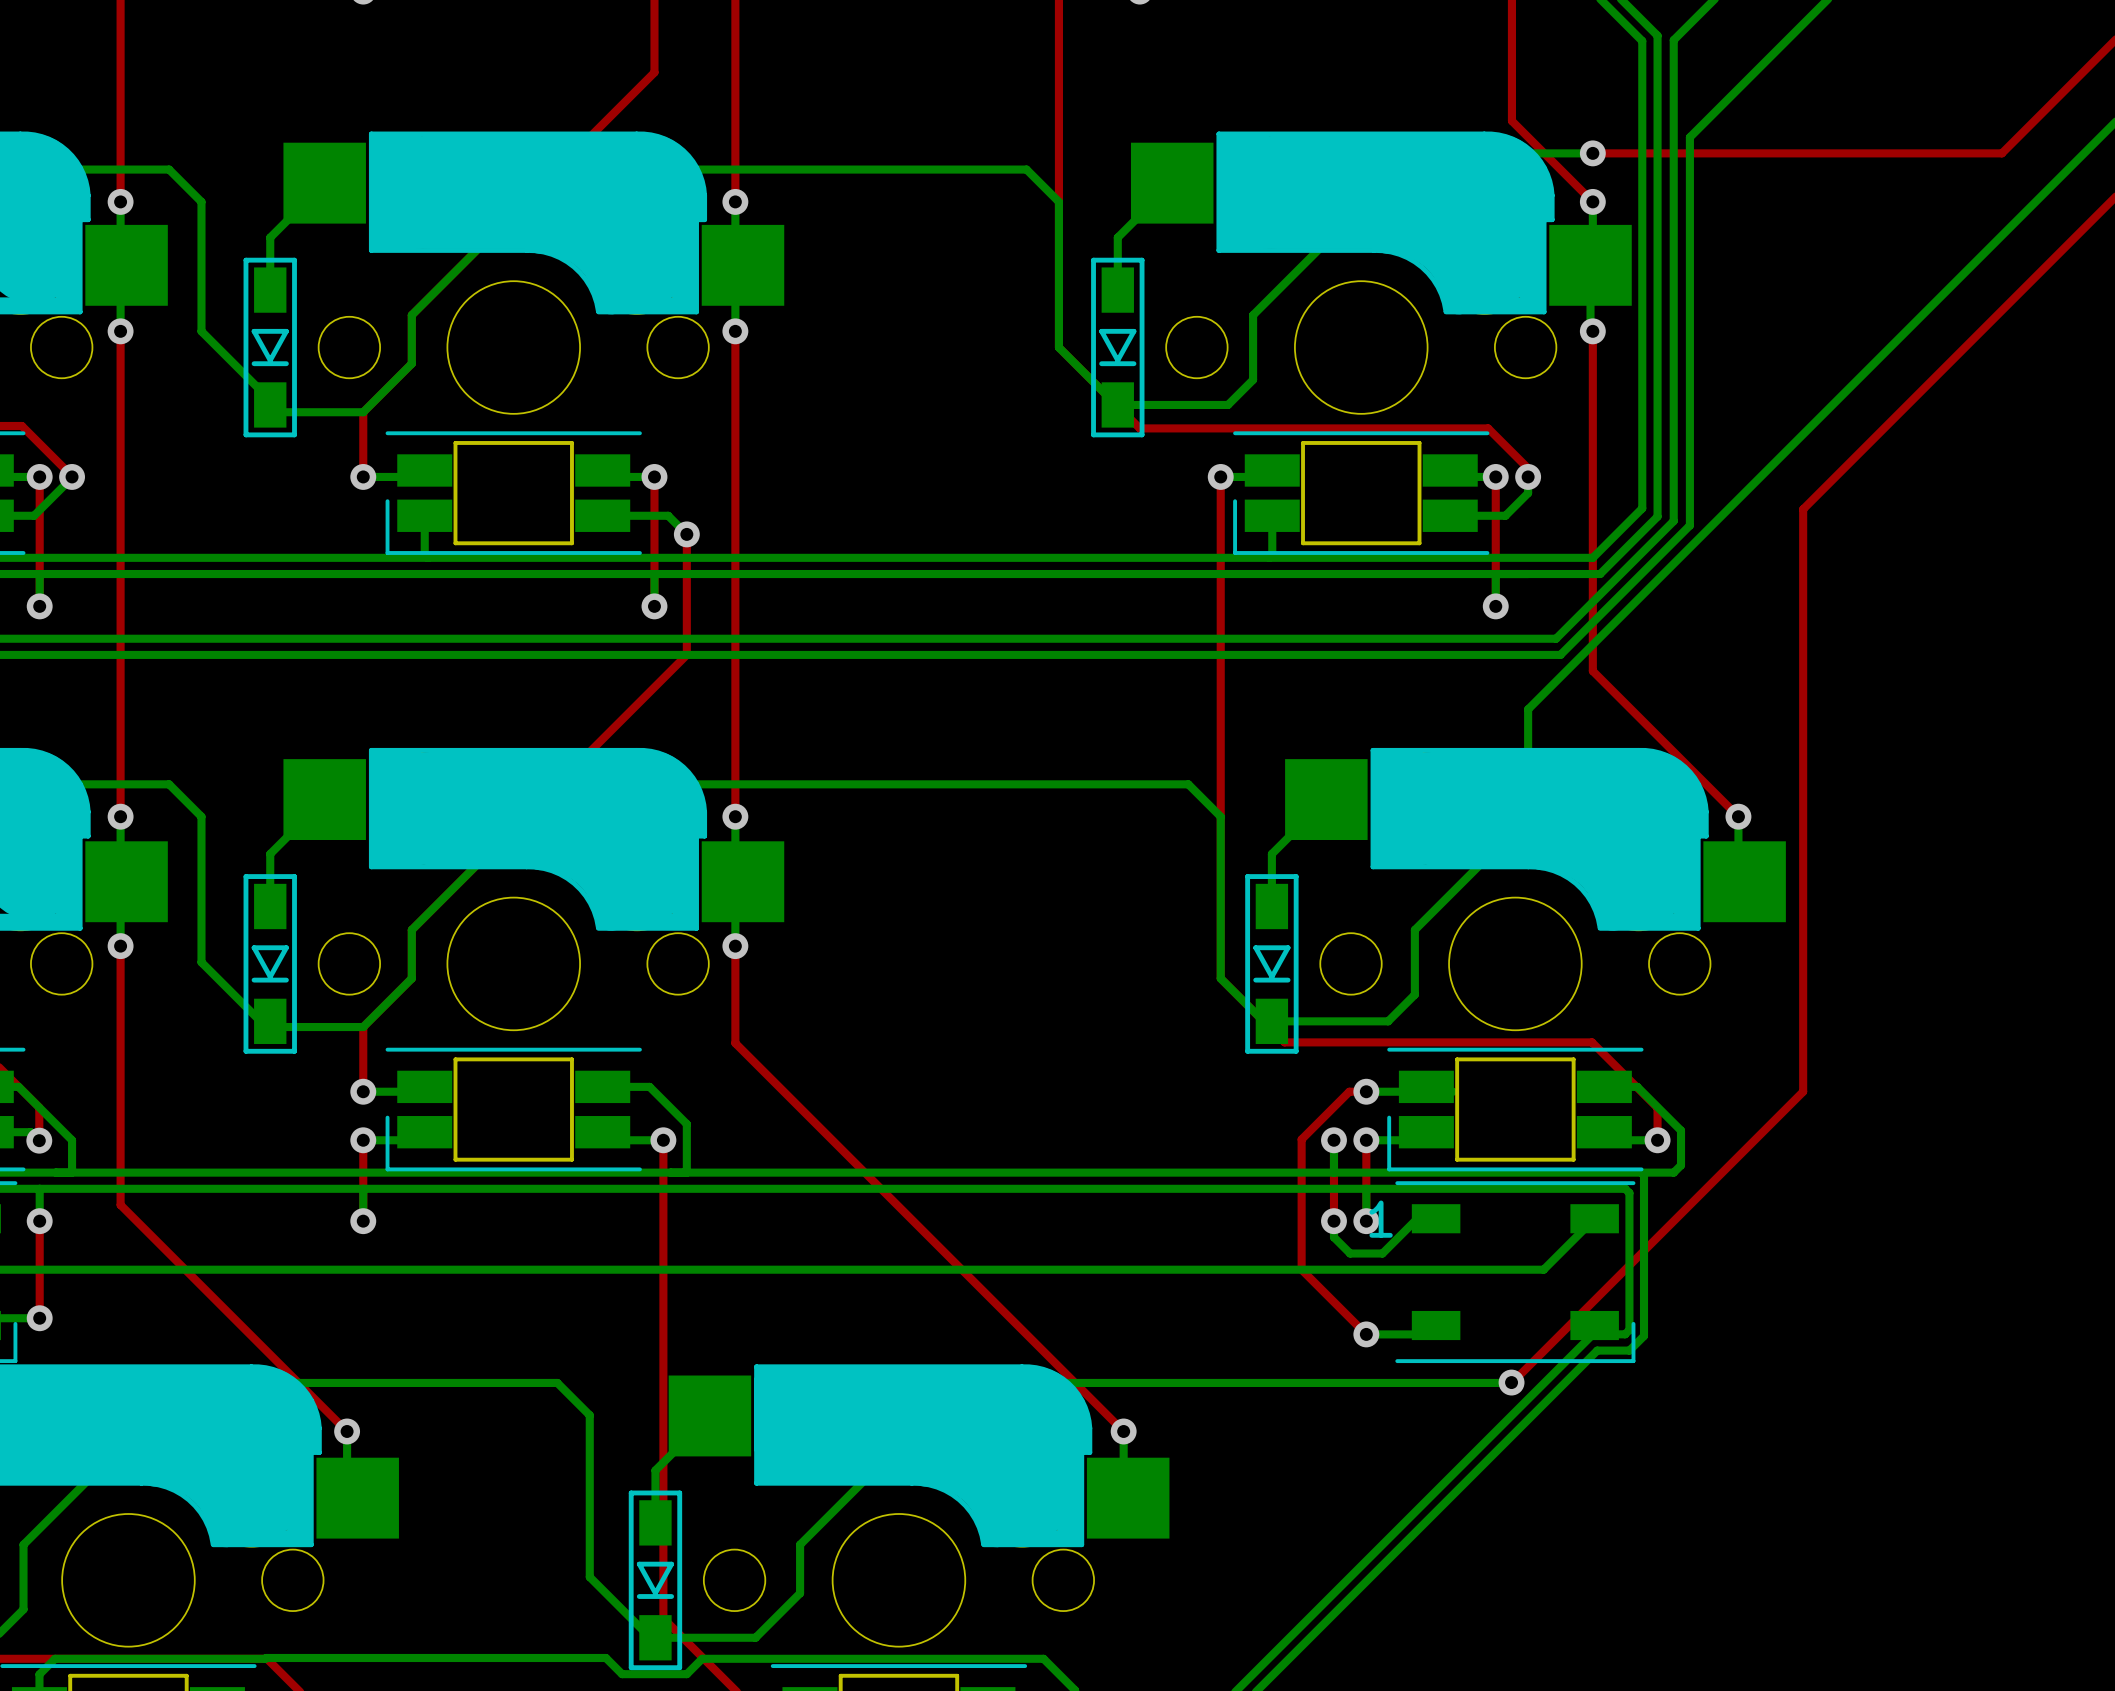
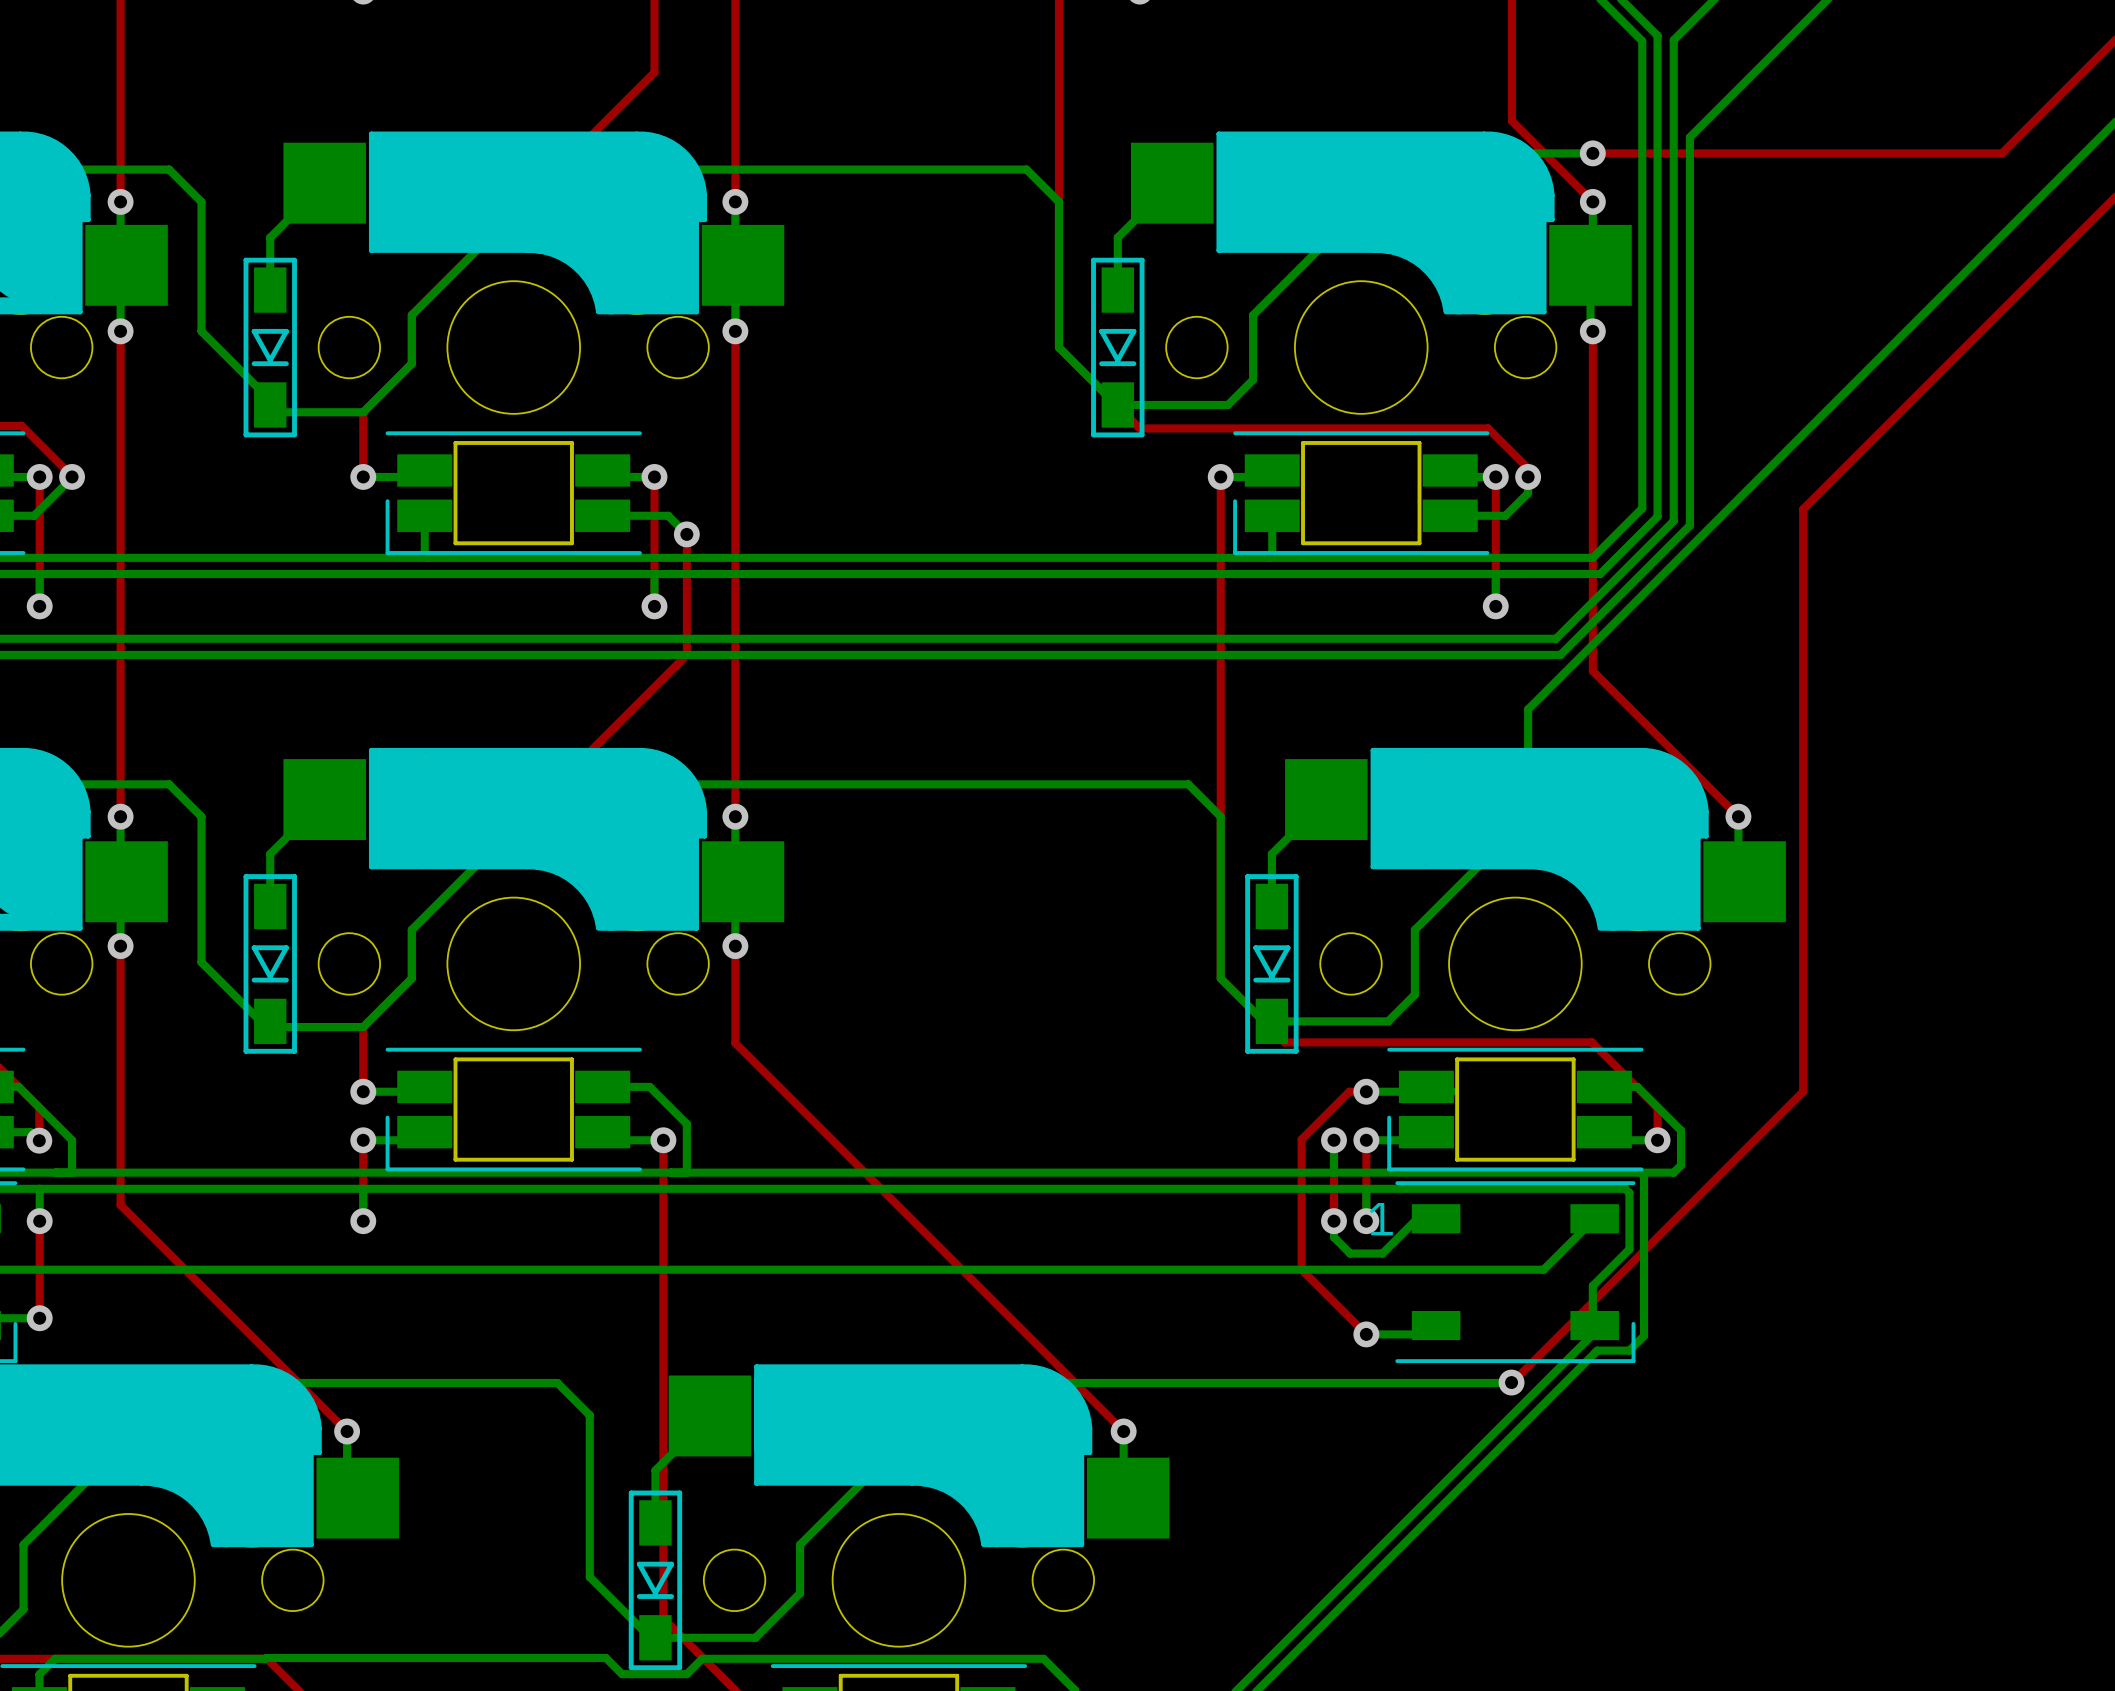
bottom track: (1629, 1249) (1629, 1330) (1625, 1334) (1603, 1334) (1592, 1323) -> (1629, 1249) (1592, 1285) (1592, 1323)

